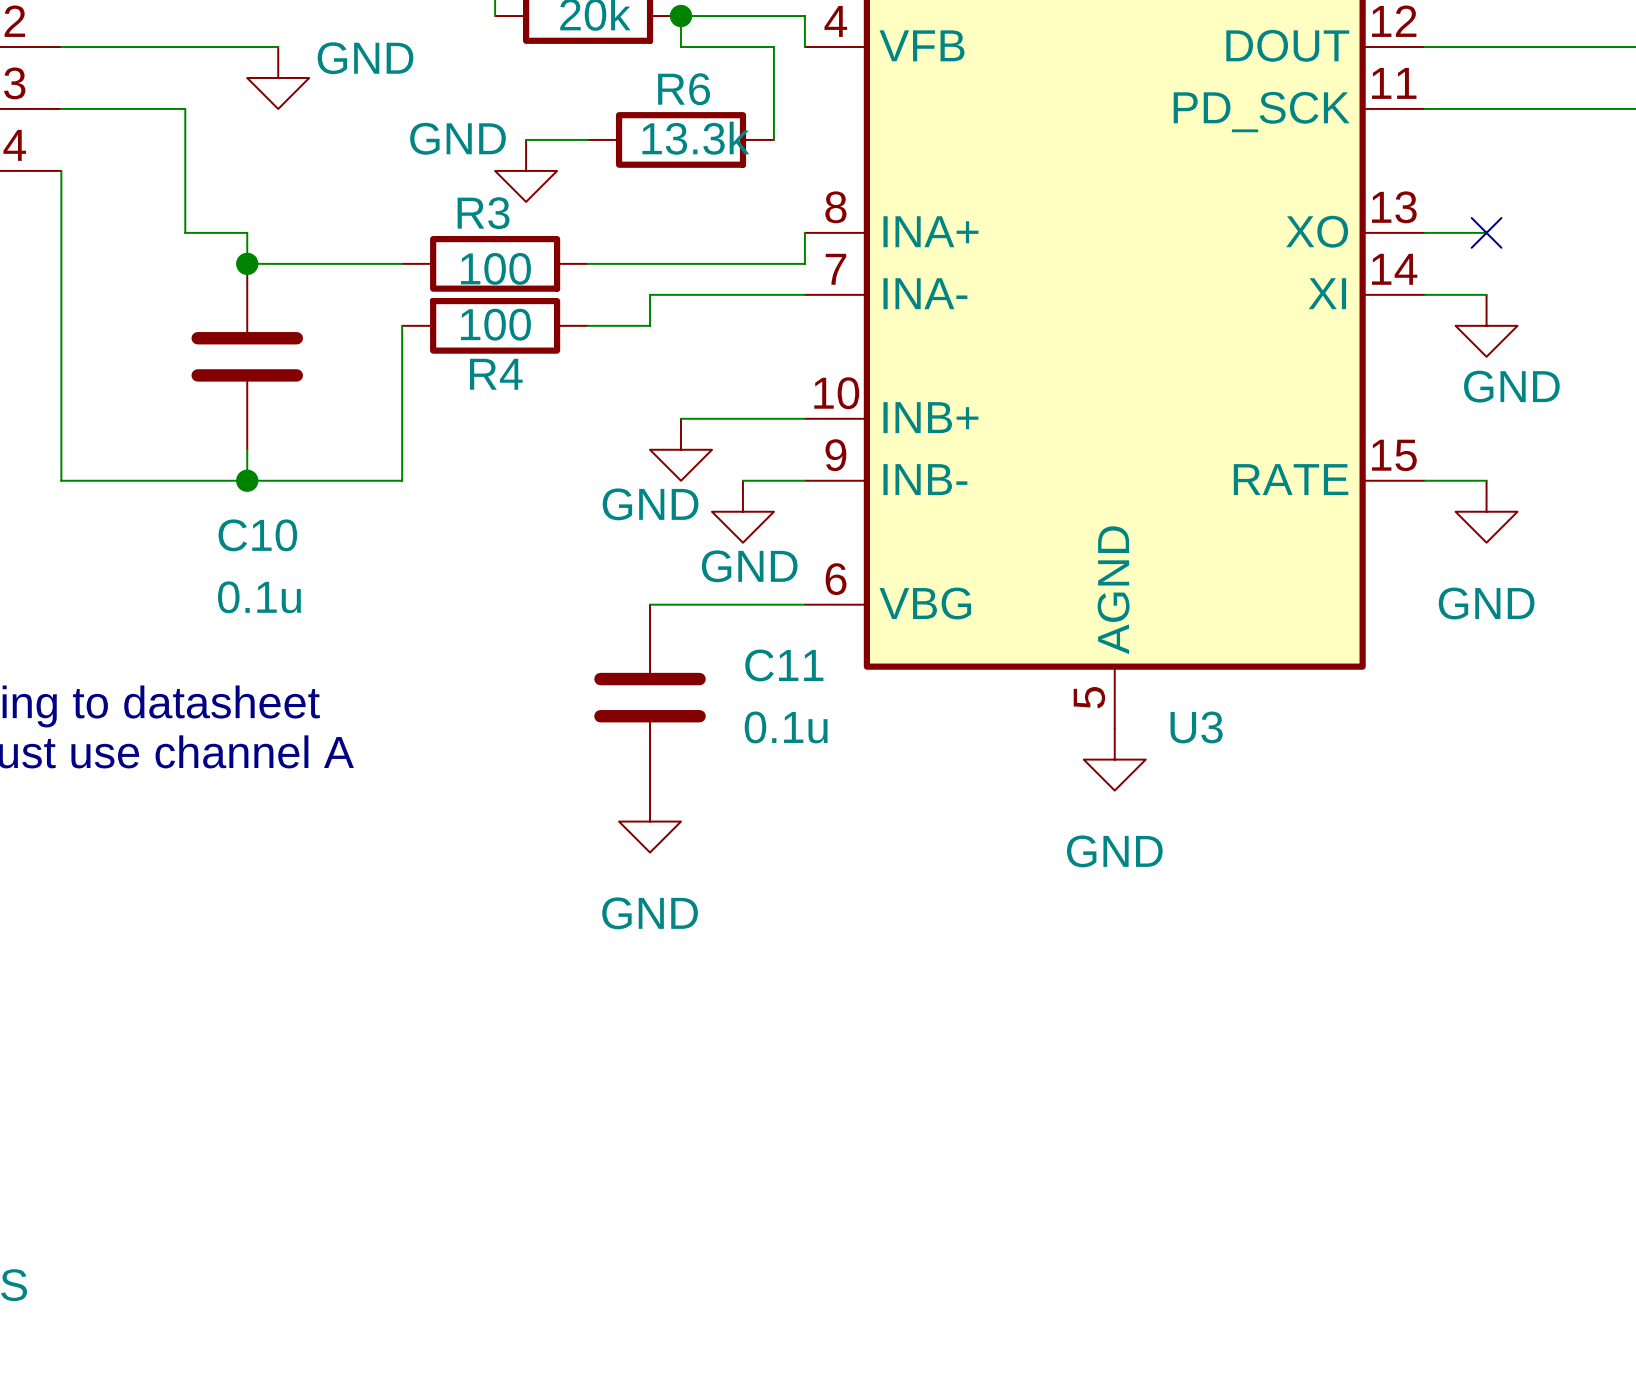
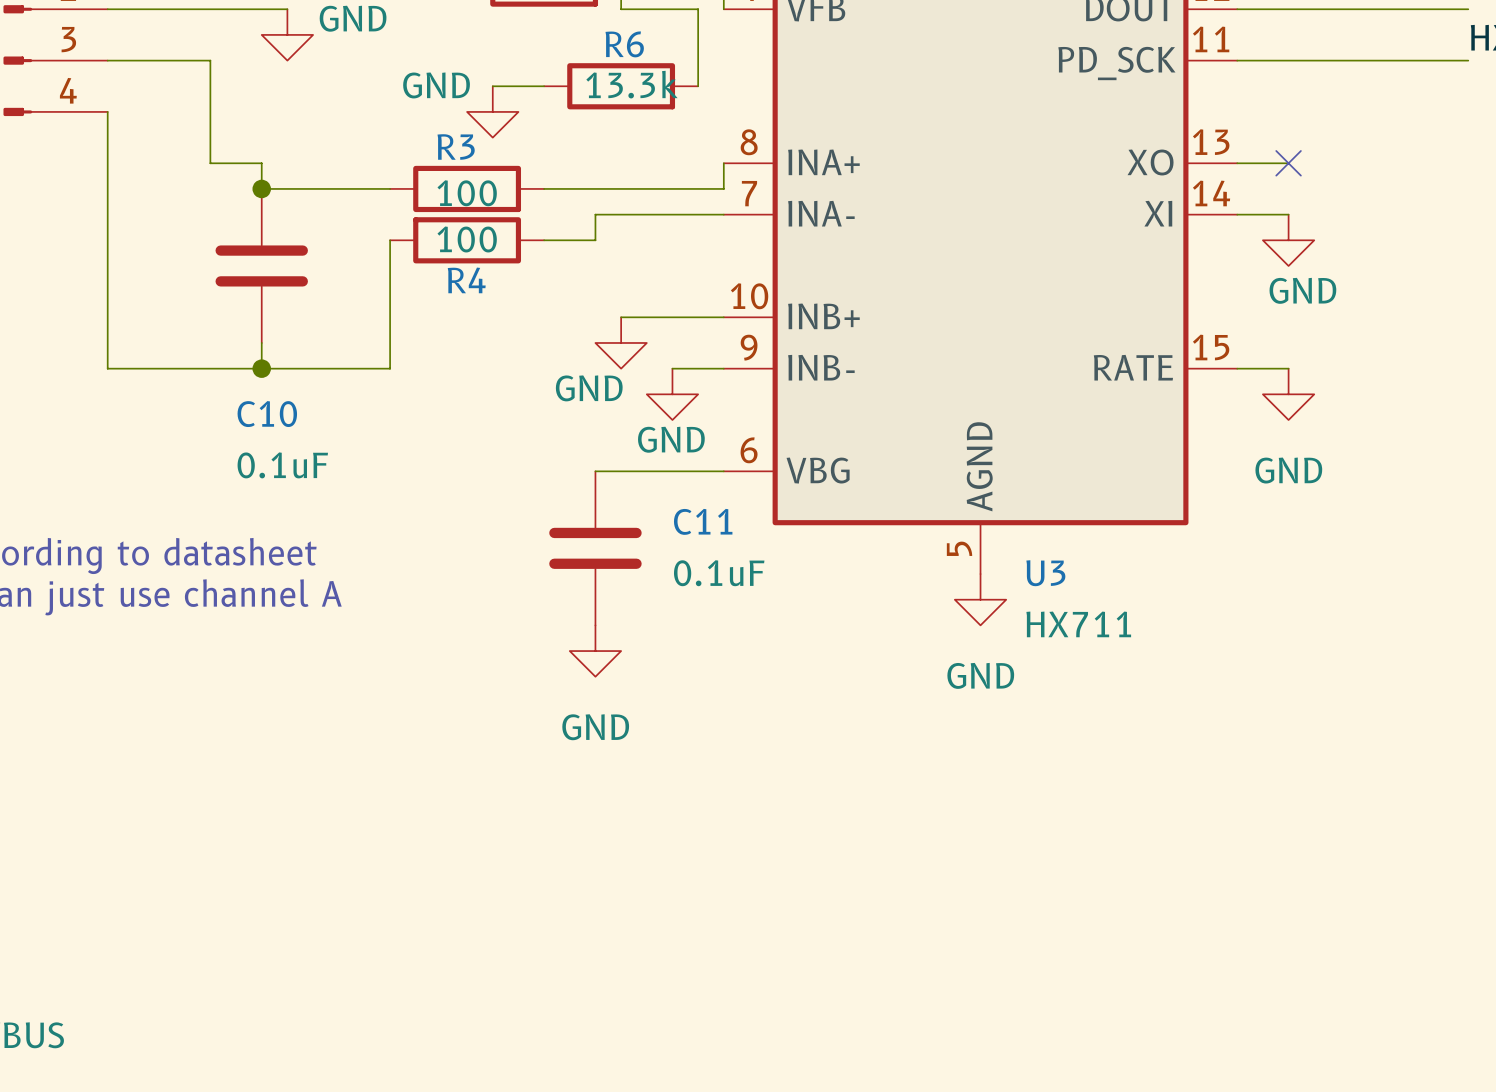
C10 value: 0.1u (259, 597) -> 0.1uF (282, 465)
C11 value: 0.1u (786, 727) -> 0.1uF (719, 573)
U3 value: none -> HX711 (1078, 624)

